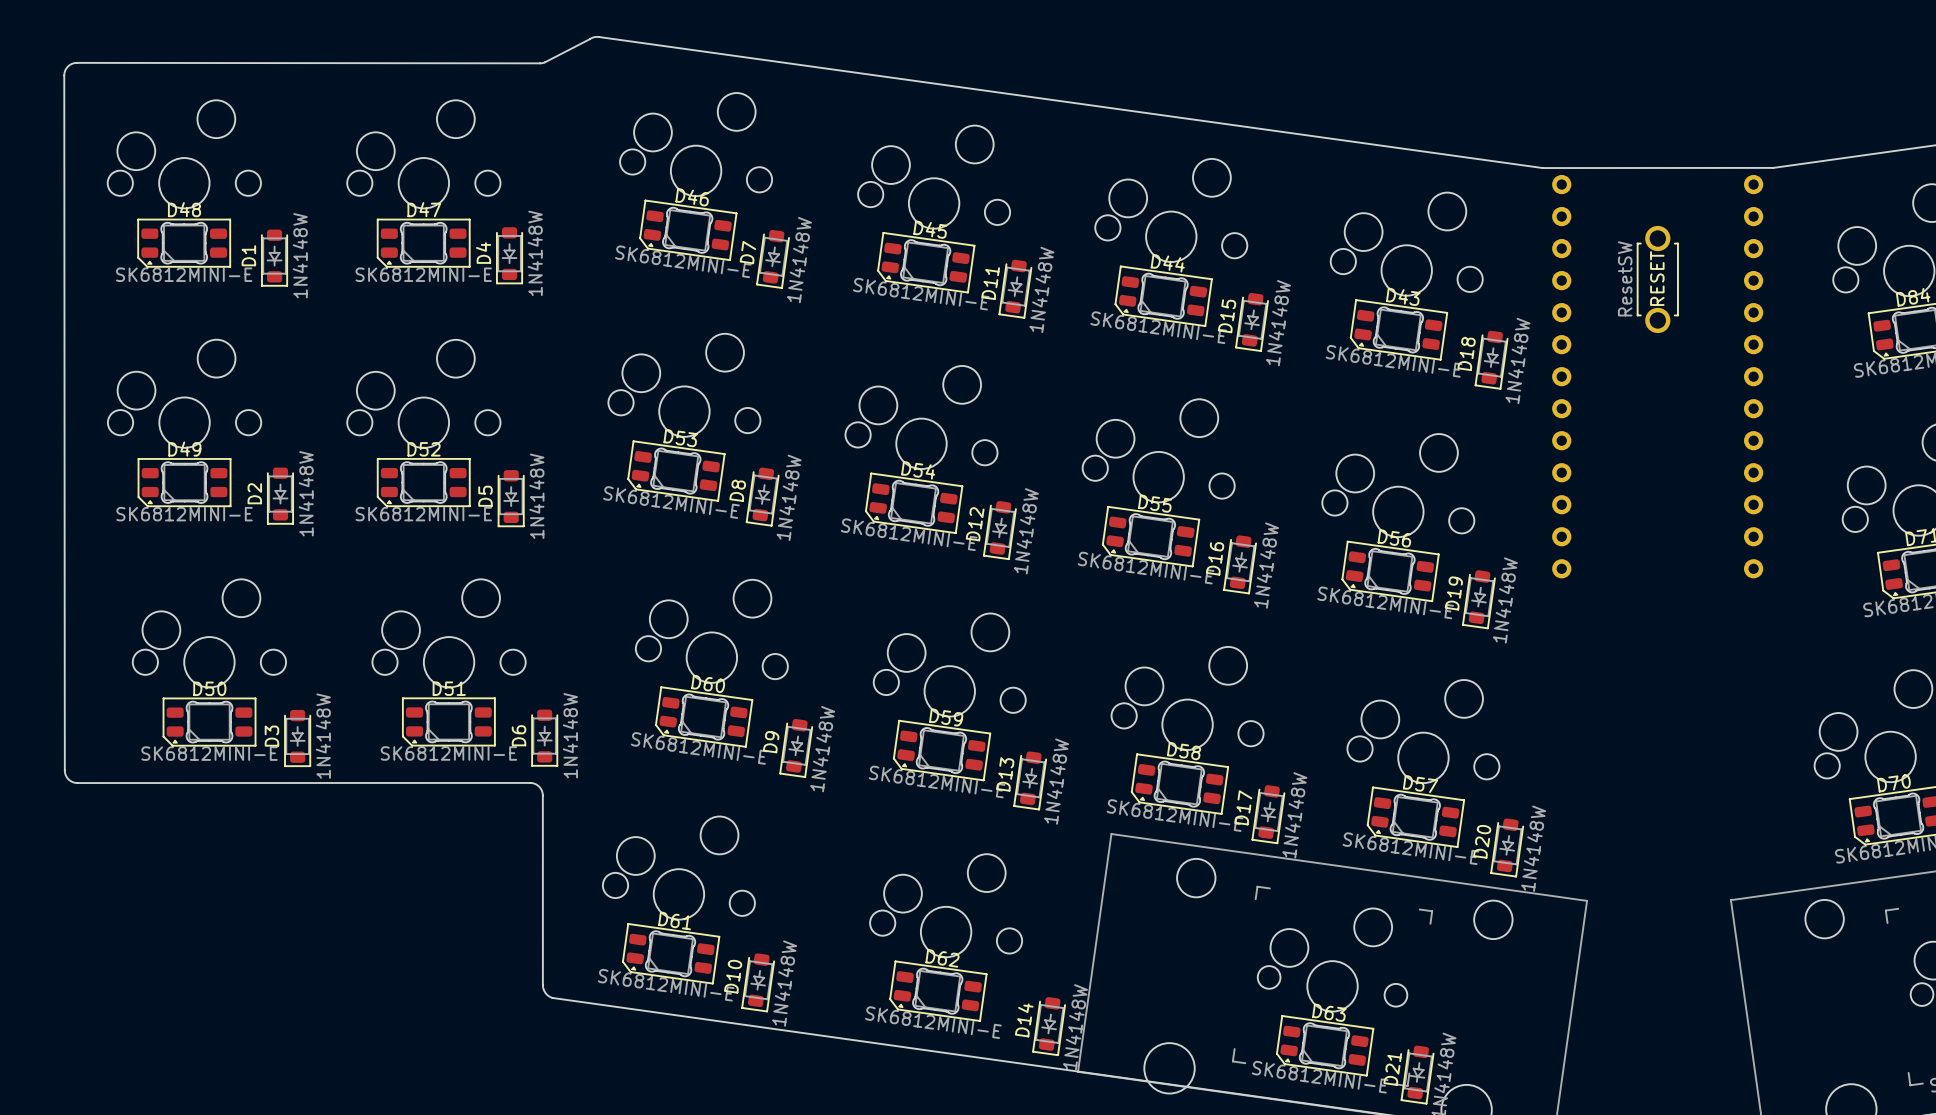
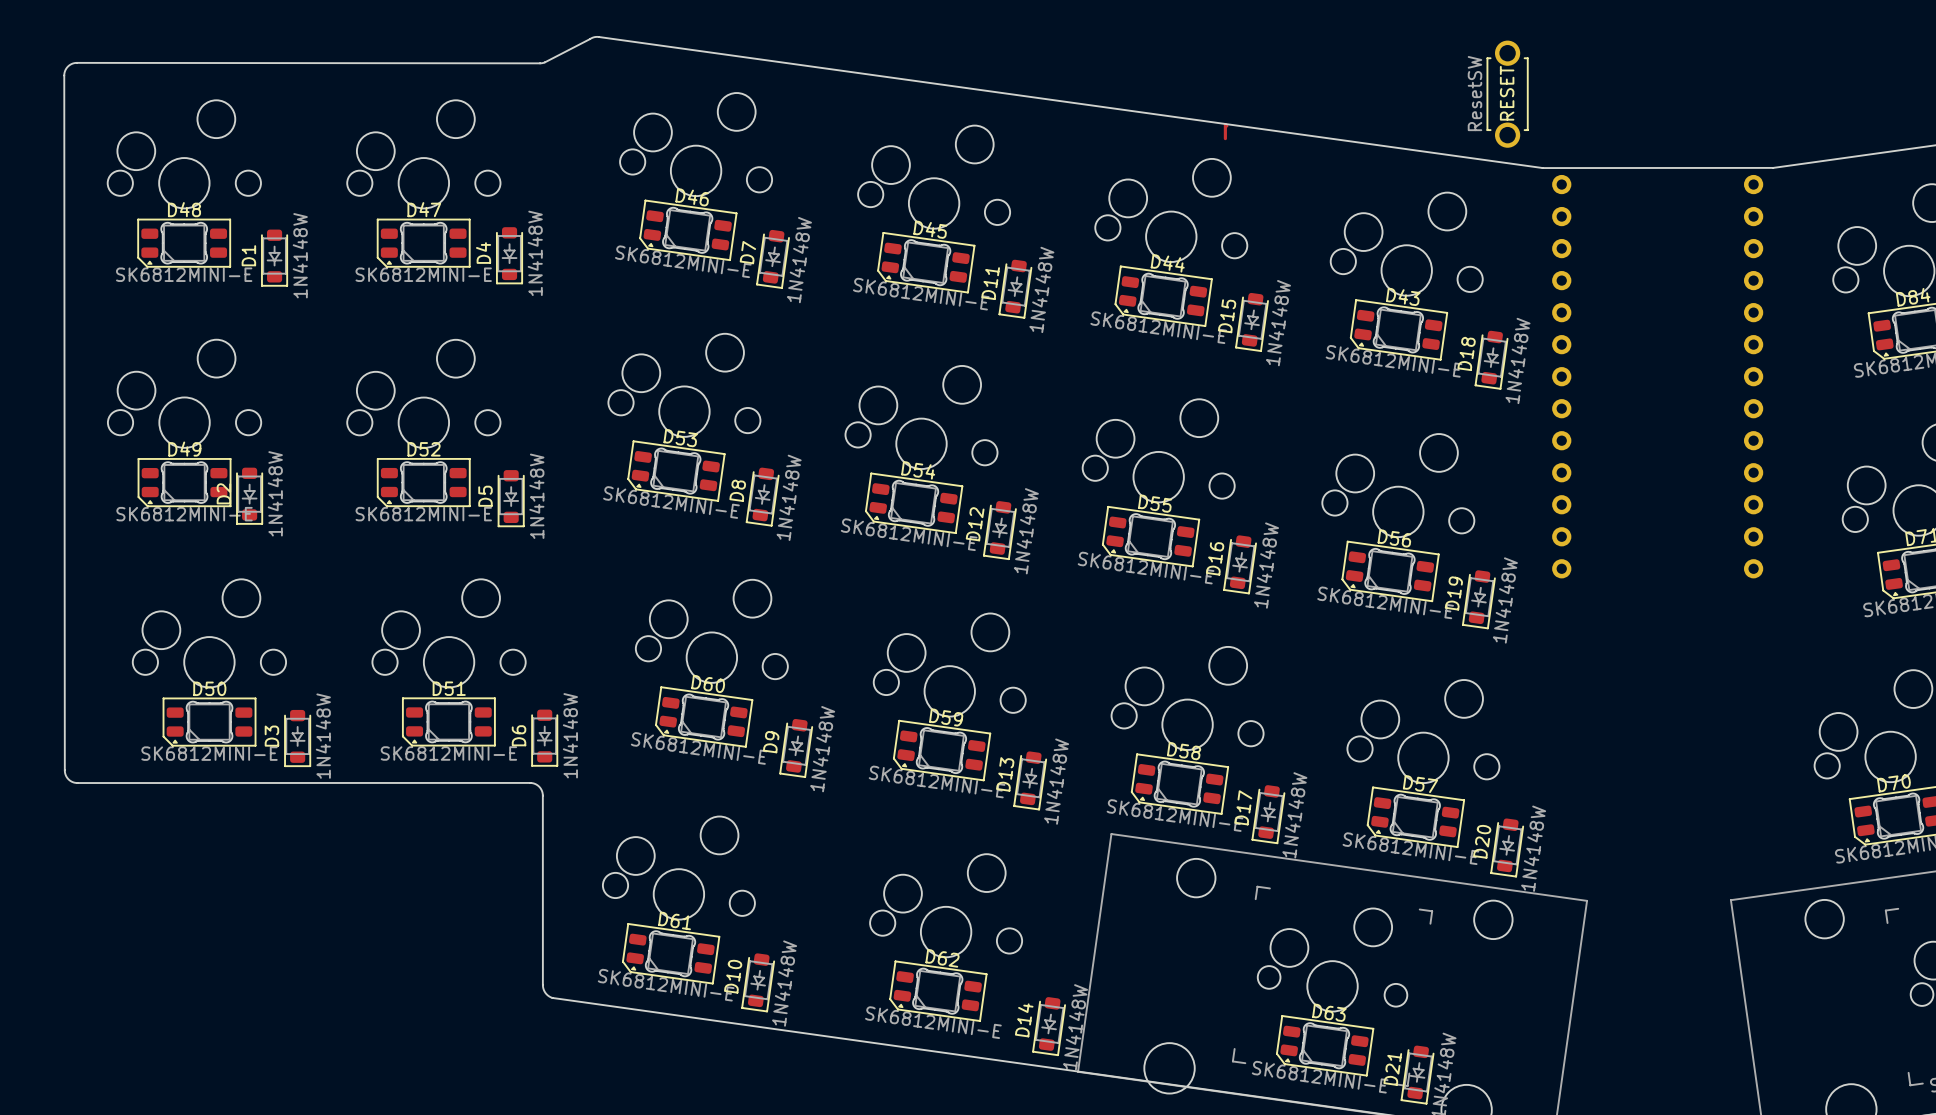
track: none -> (1226, 126) (1225, 124) (1225, 138)
part position: (1657, 279) -> (1507, 94)
D2 position: (280, 496) -> (249, 496)

